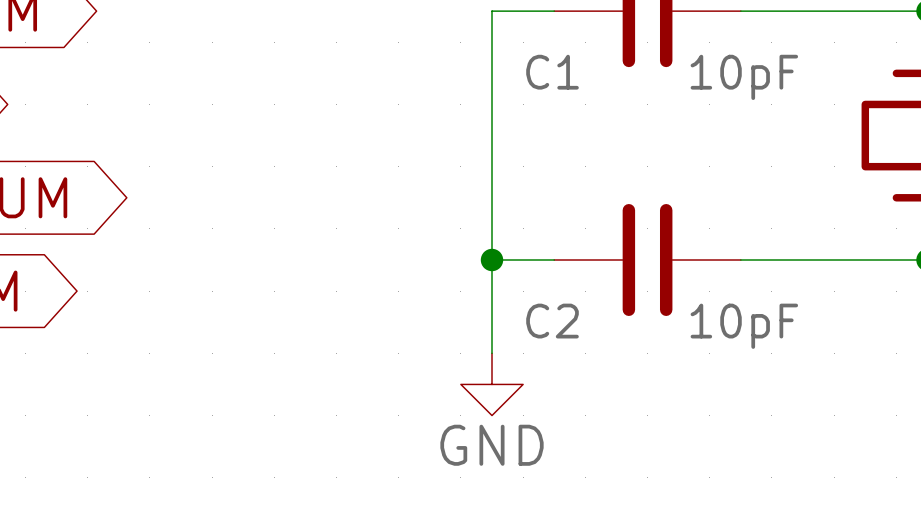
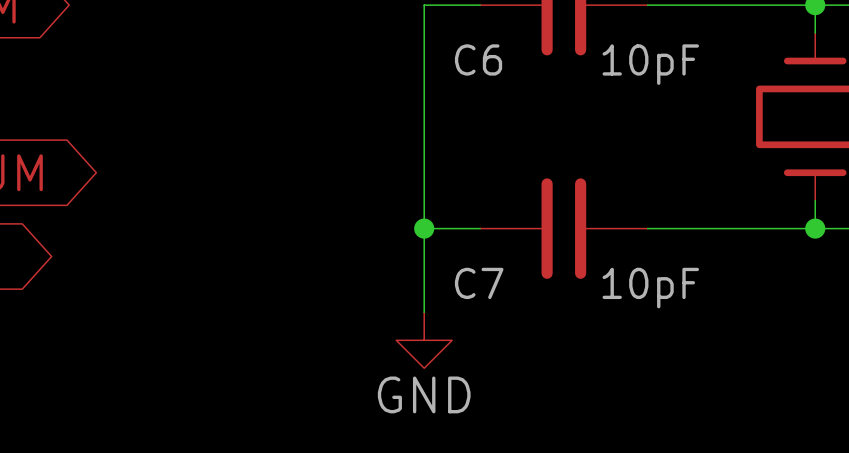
C1 name: C1 (552, 72) -> C6 (478, 59)
C2 name: C2 (552, 321) -> C7 (479, 283)

